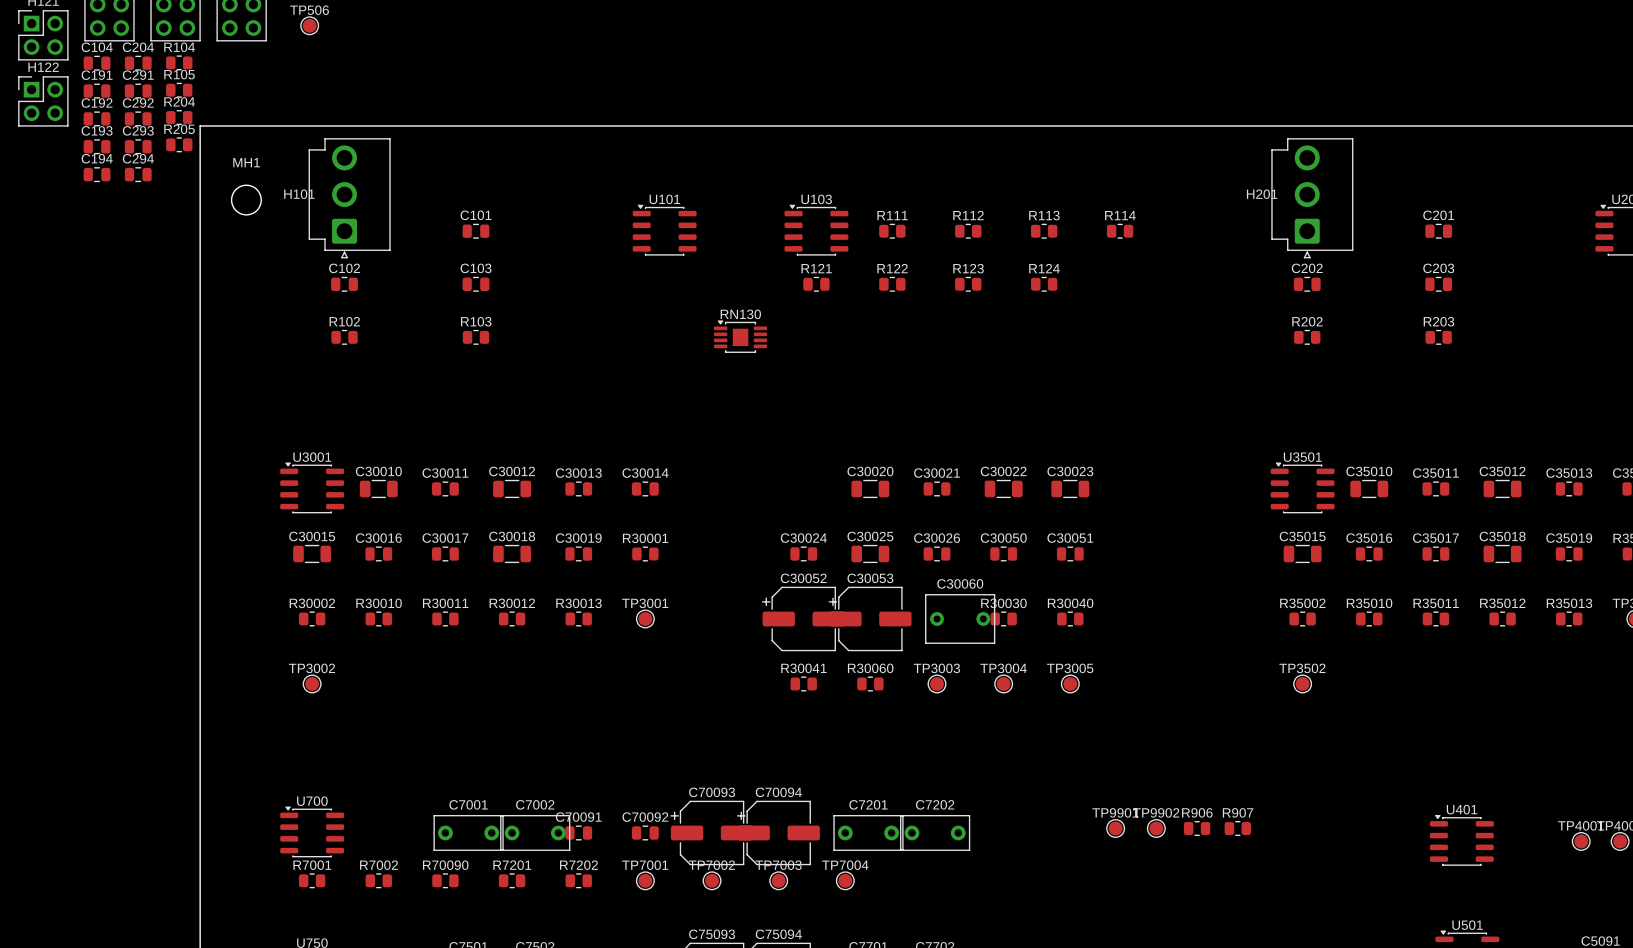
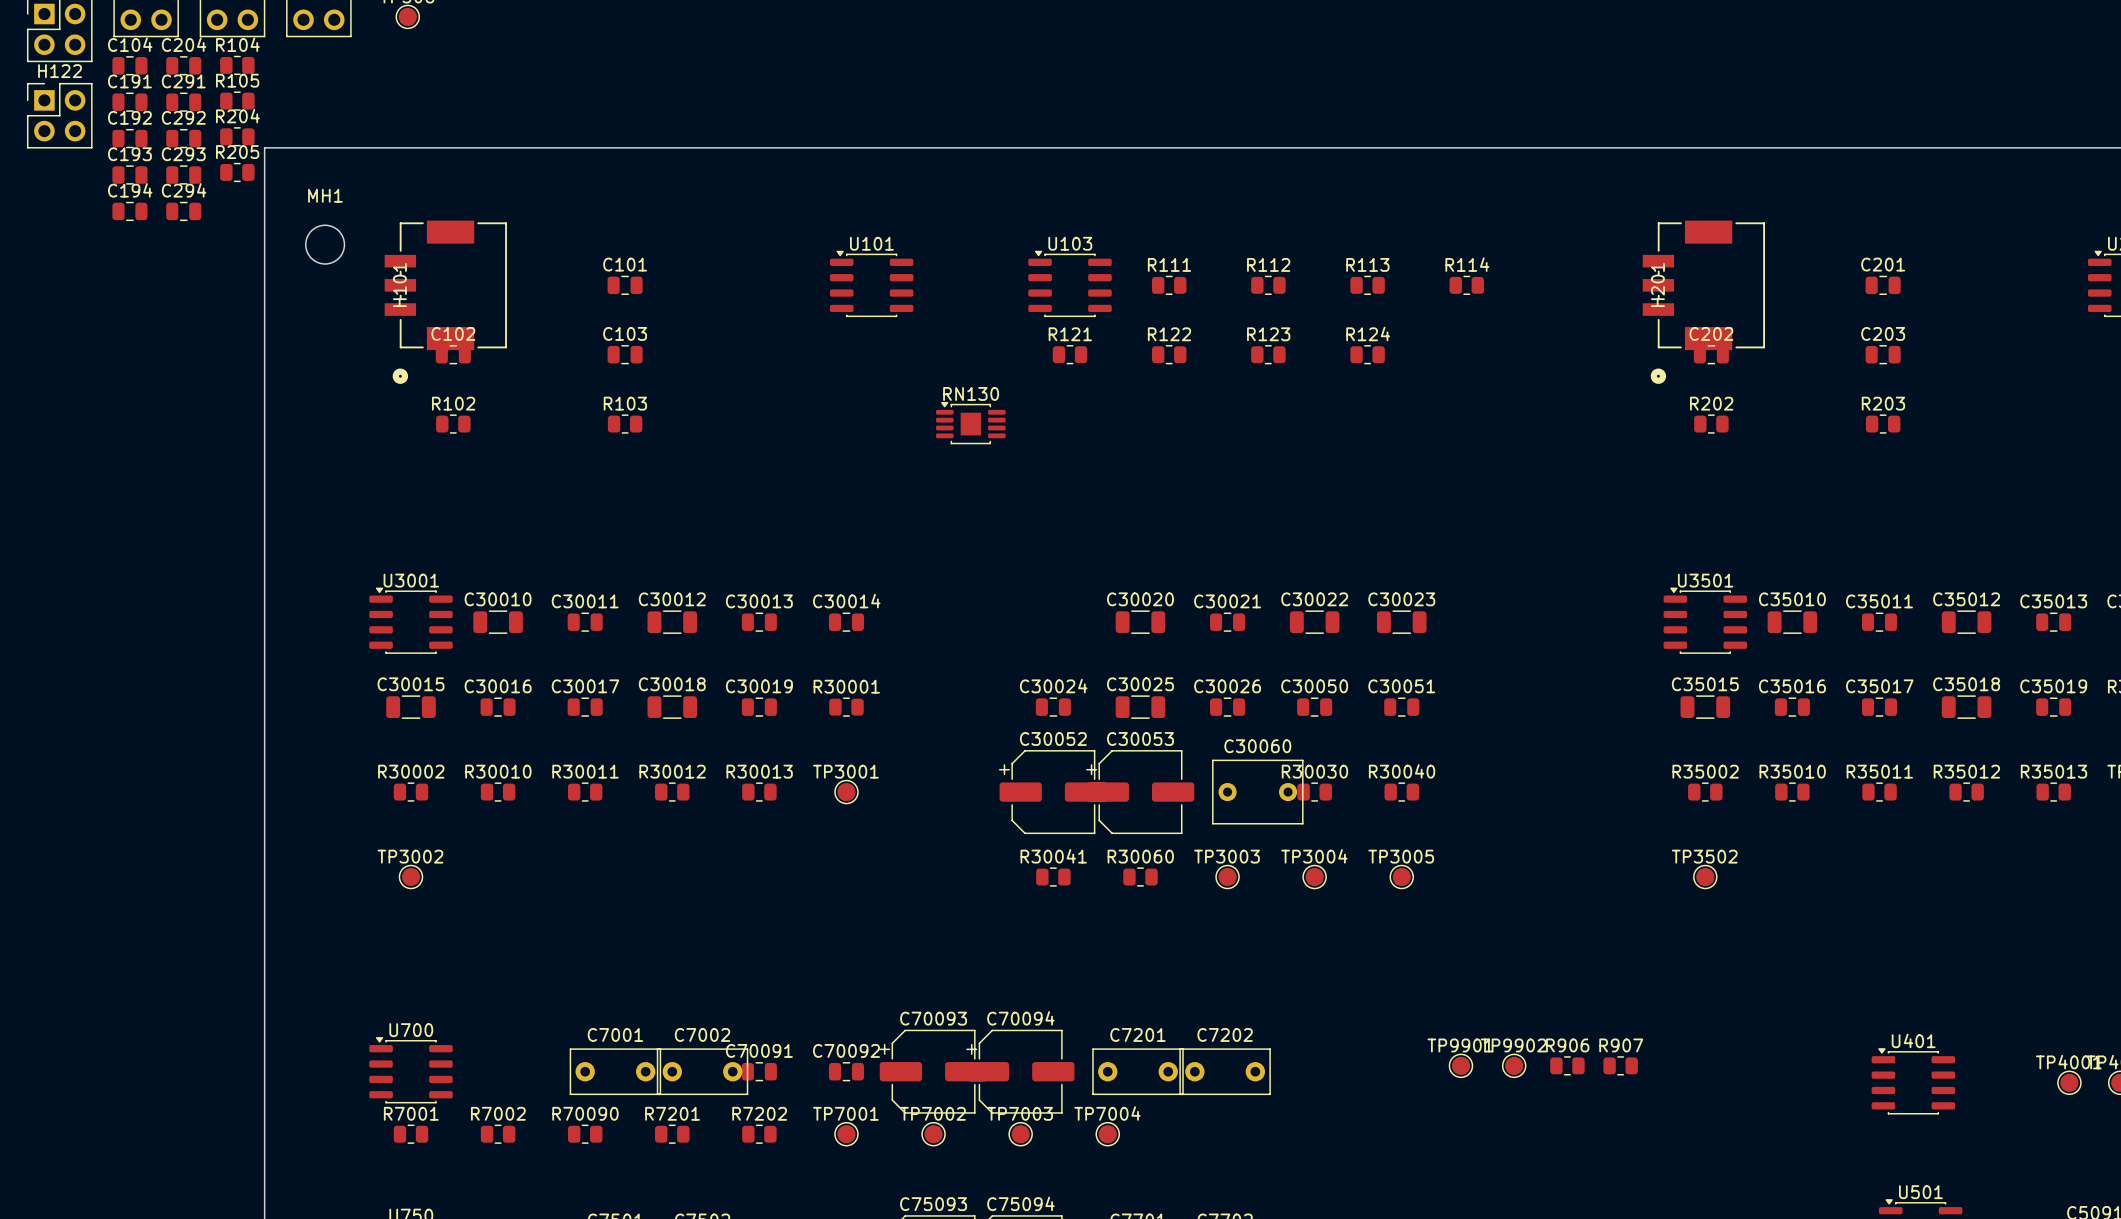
H101 footprint: [308, 138, 391, 259] -> [384, 220, 507, 384]
H201 footprint: [1271, 138, 1354, 259] -> [1642, 220, 1765, 384]

